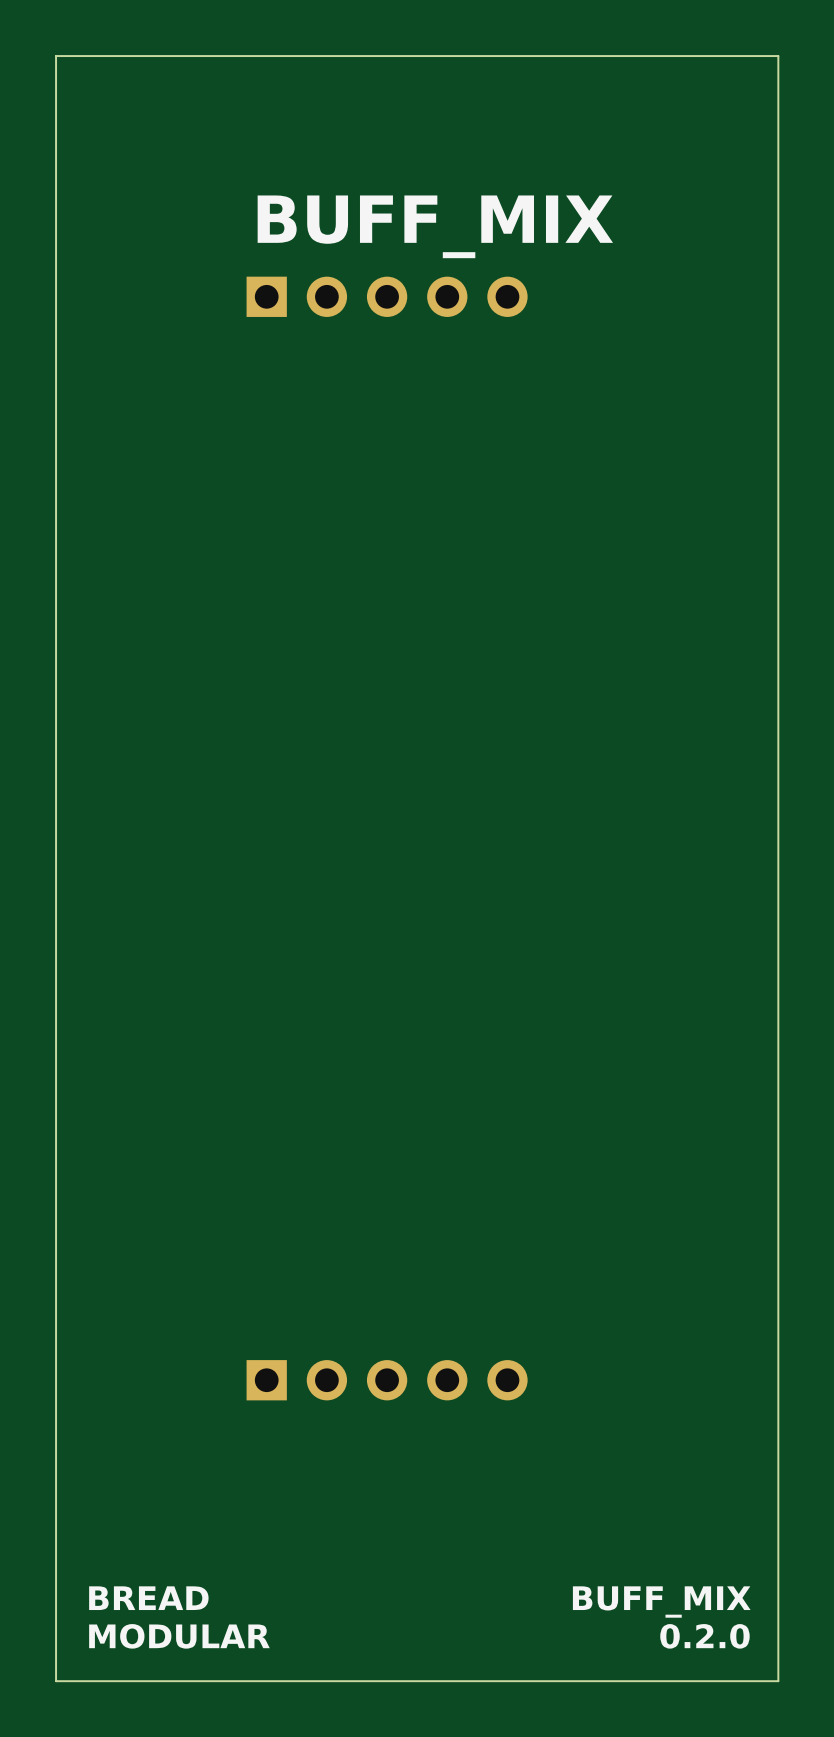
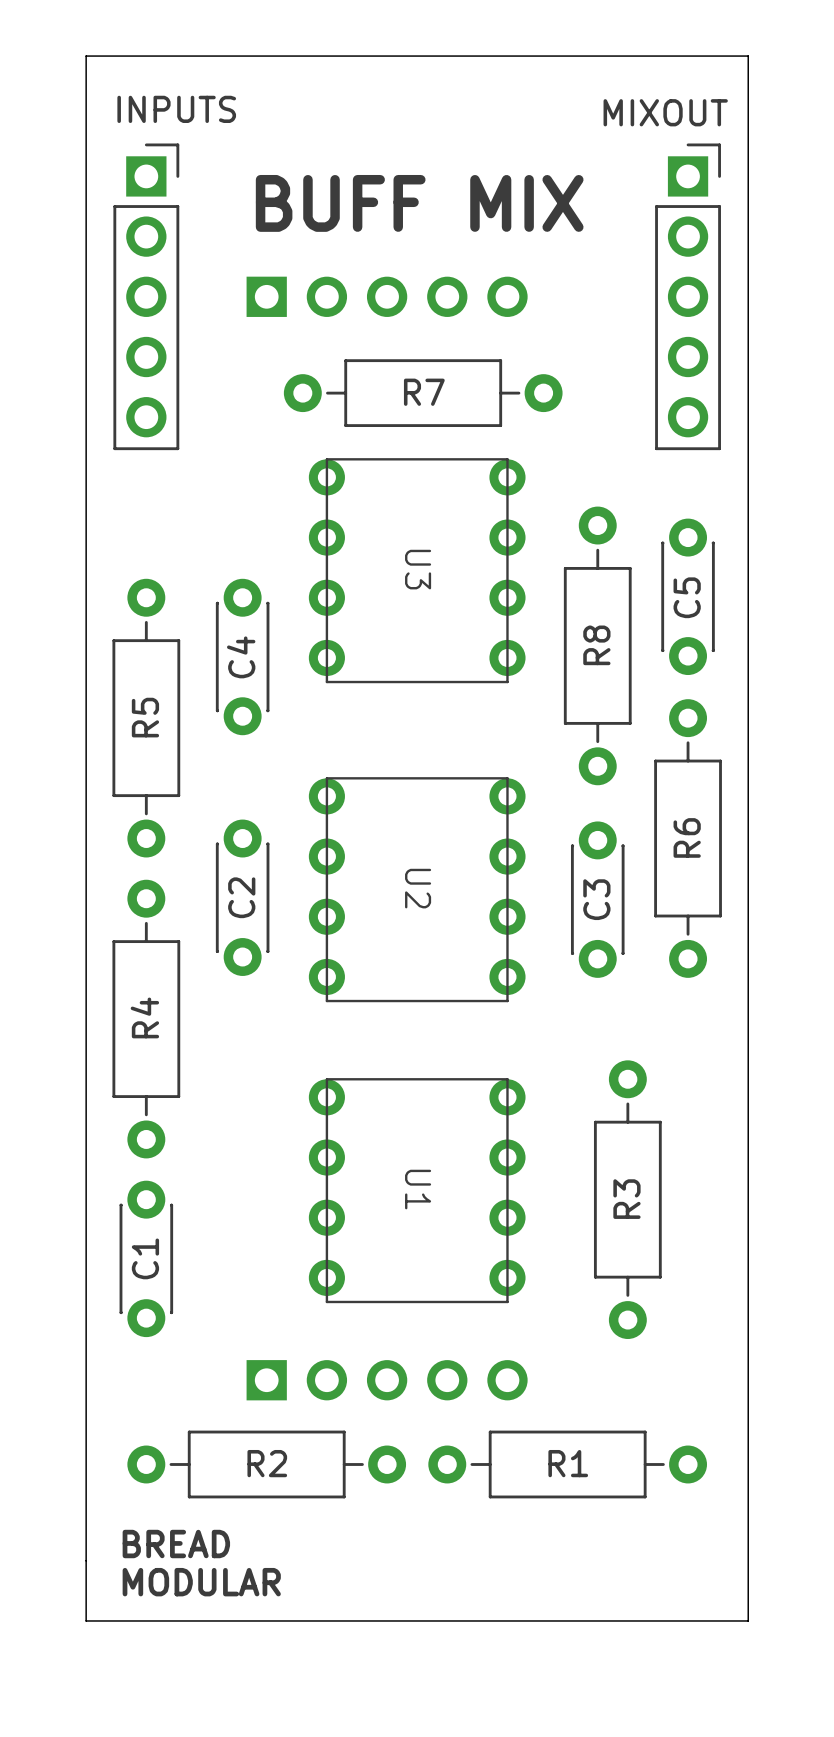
board edge: (86, 56) (56, 56) (56, 1681) (778, 1681) (778, 56) (748, 56) -> (86, 56) (86, 1620) (748, 1620) (748, 56)
text: BUFF_MIX (435, 226) -> BUFF MIX (419, 203)
INPUTS: none -> (146, 296)
MIXOUT: none -> (688, 296)
R7: none -> (423, 393)
U3: none -> (417, 570)
C5: none -> (688, 596)
R8: none -> (597, 645)
C4: none -> (242, 657)
R5: none -> (146, 718)
R6: none -> (688, 838)
U2: none -> (417, 889)
C2: none -> (242, 897)
C3: none -> (597, 899)
R4: none -> (146, 1019)
U1: none -> (417, 1190)
R3: none -> (627, 1199)
C1: none -> (146, 1258)
R2: none -> (266, 1464)
R1: none -> (567, 1464)
text position: BREAD (148, 1598) -> BREAD (176, 1544)
text: BUFF_MIX (661, 1602) -> none
text position: MODULAR (179, 1636) -> MODULAR (201, 1582)
text: 0.2.0 (704, 1636) -> none

